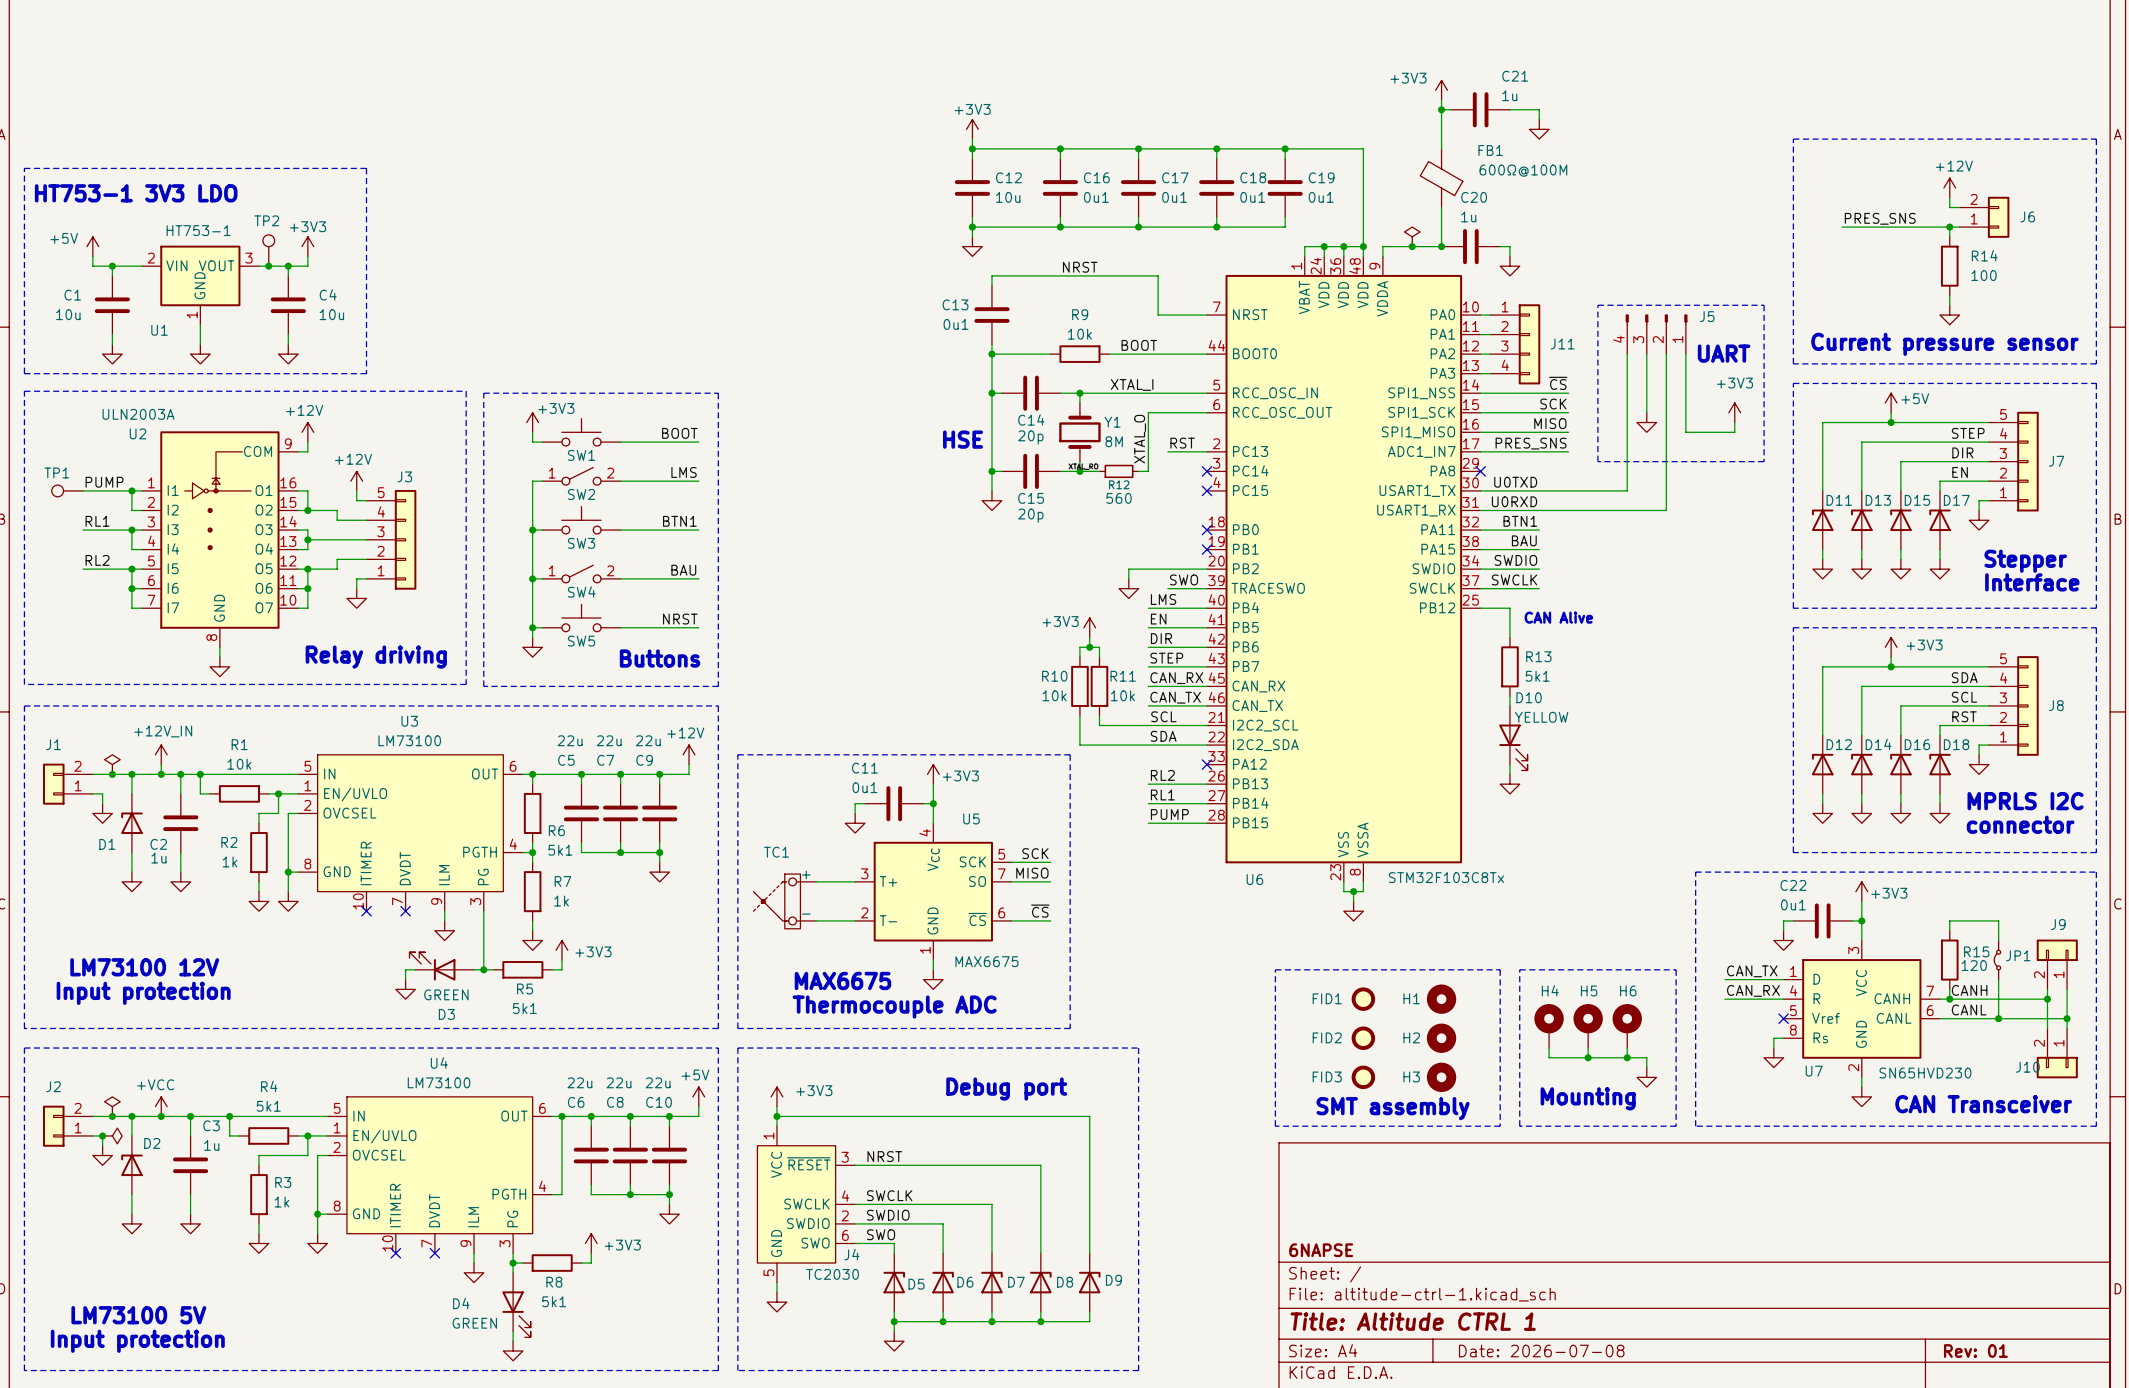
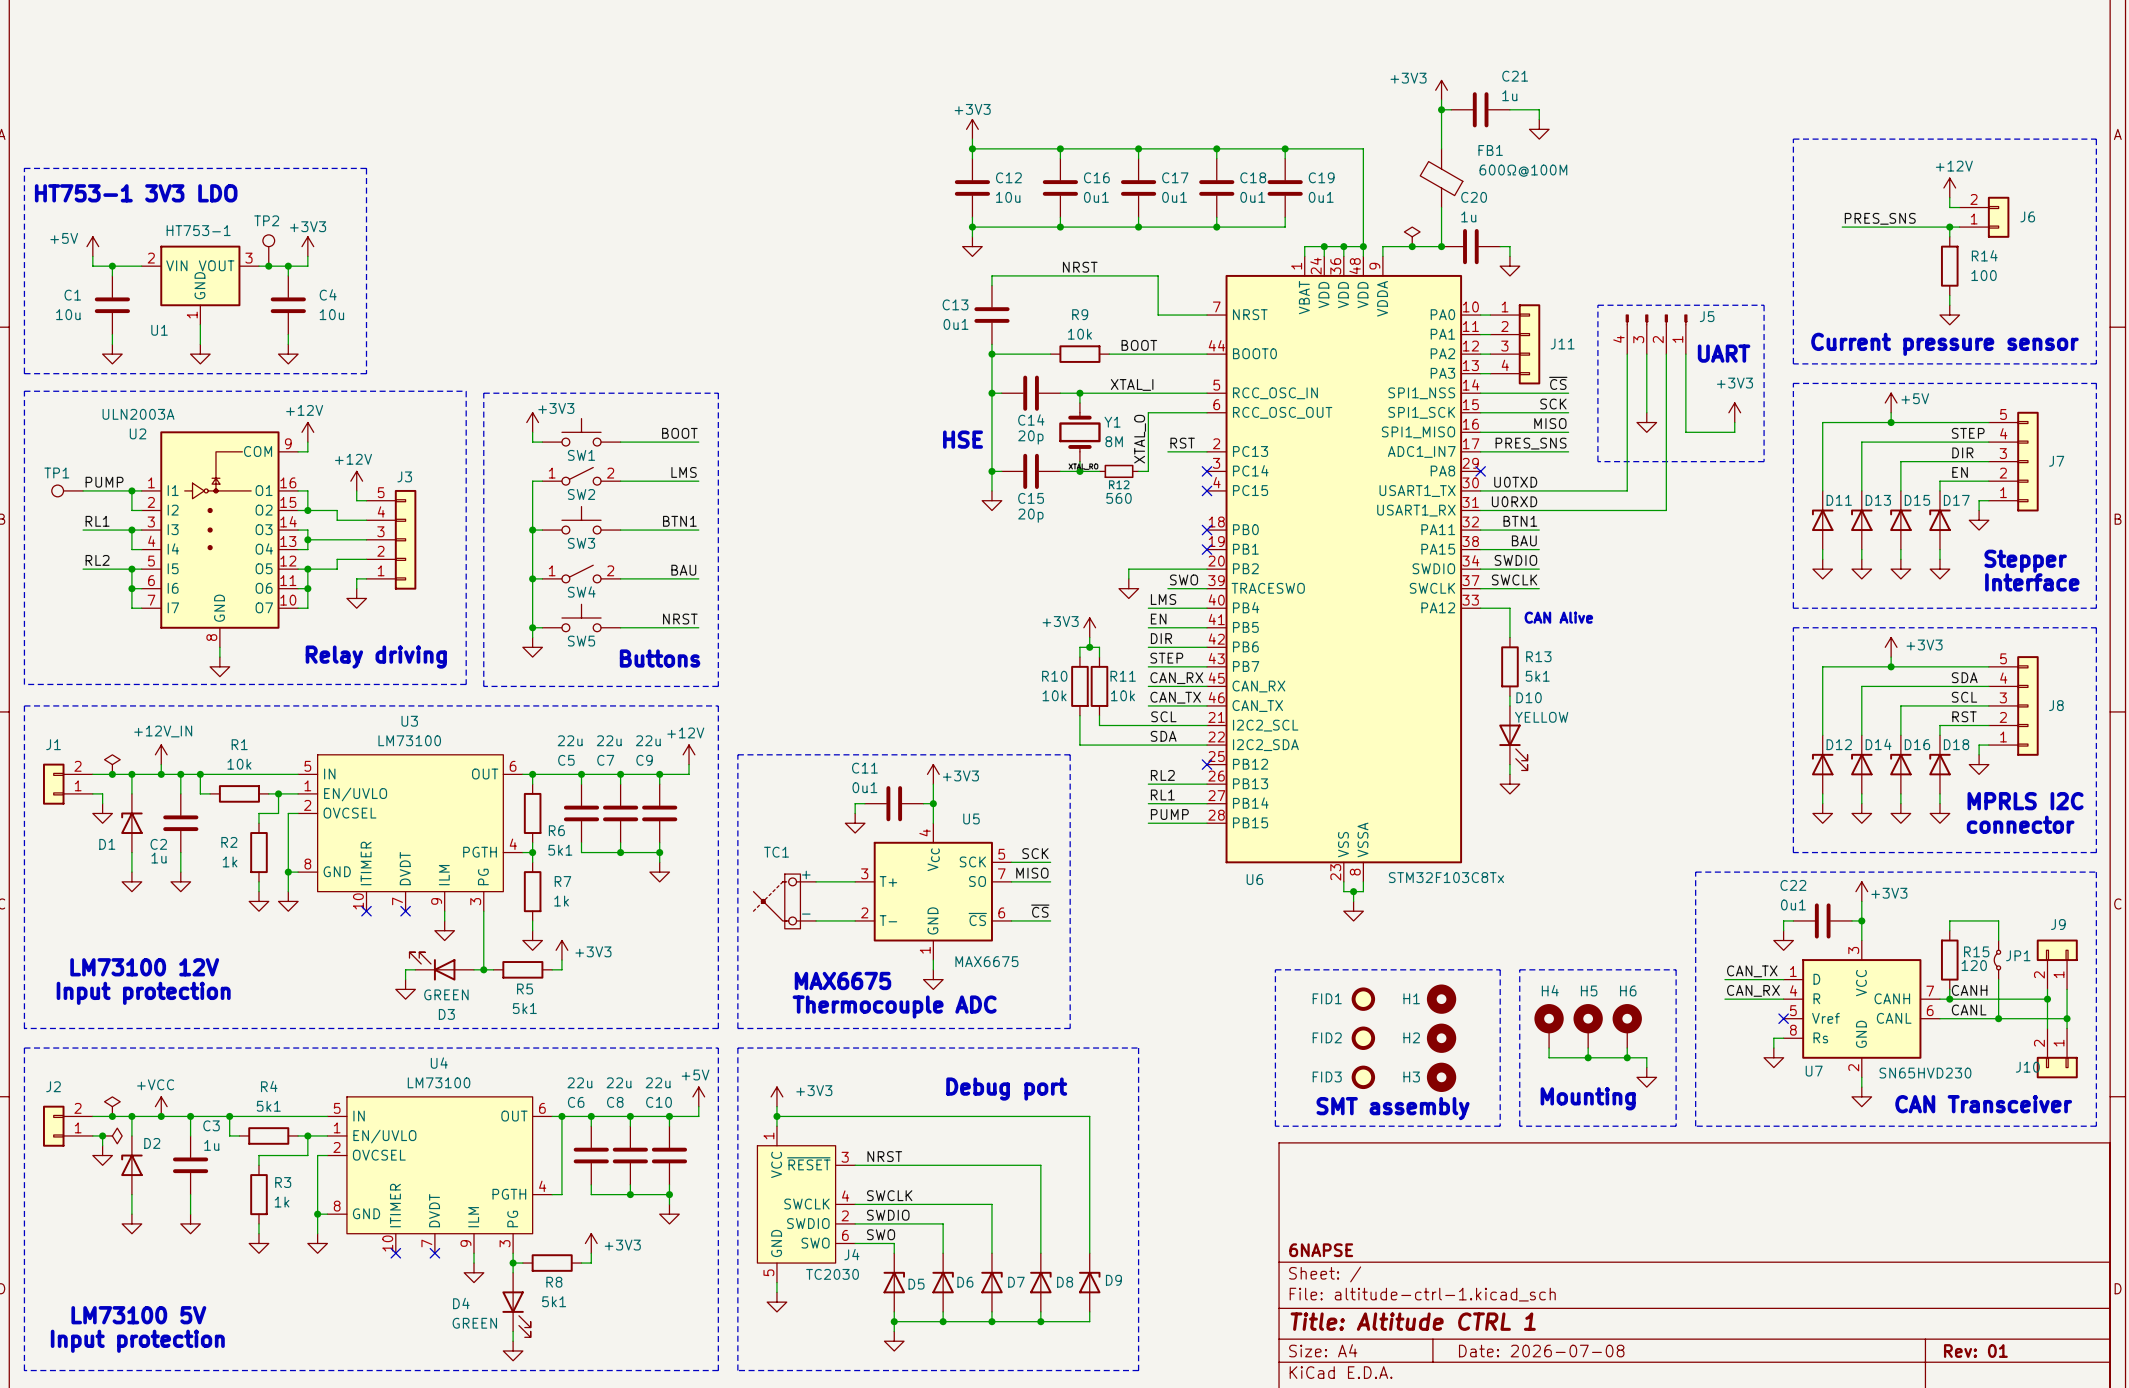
U6 pin number: 25 (1470, 600) -> 33 (1470, 600)
U6 pin name: PB12 (1437, 607) -> PA12 (1438, 607)
U6 pin number: 33 (1216, 756) -> 25 (1216, 756)
U6 pin name: PA12 (1249, 764) -> PB12 (1250, 764)

